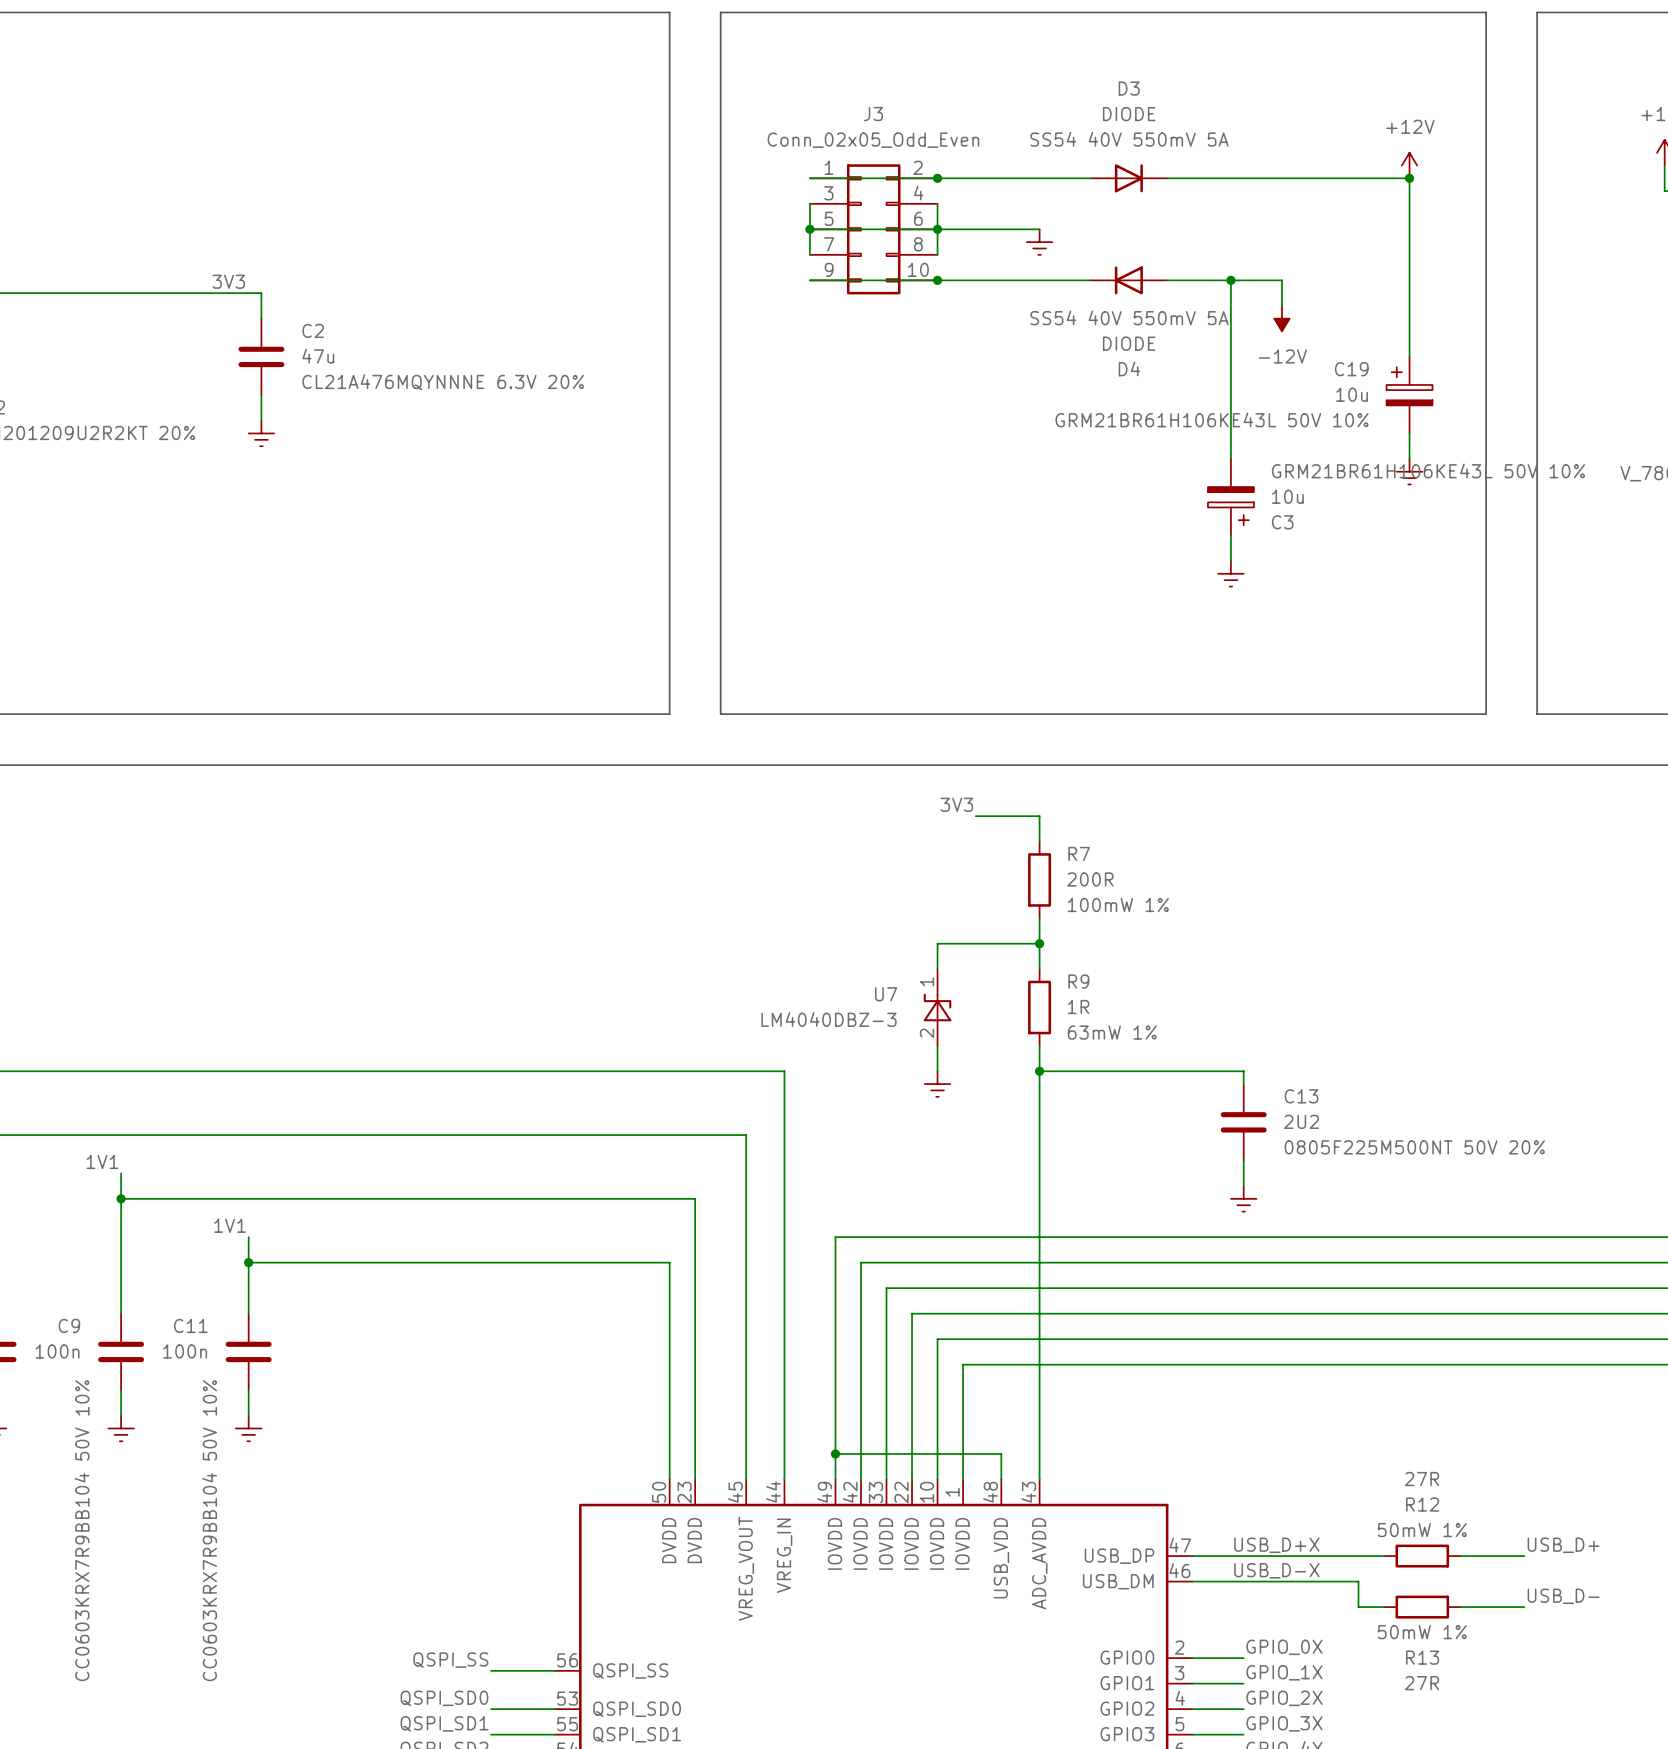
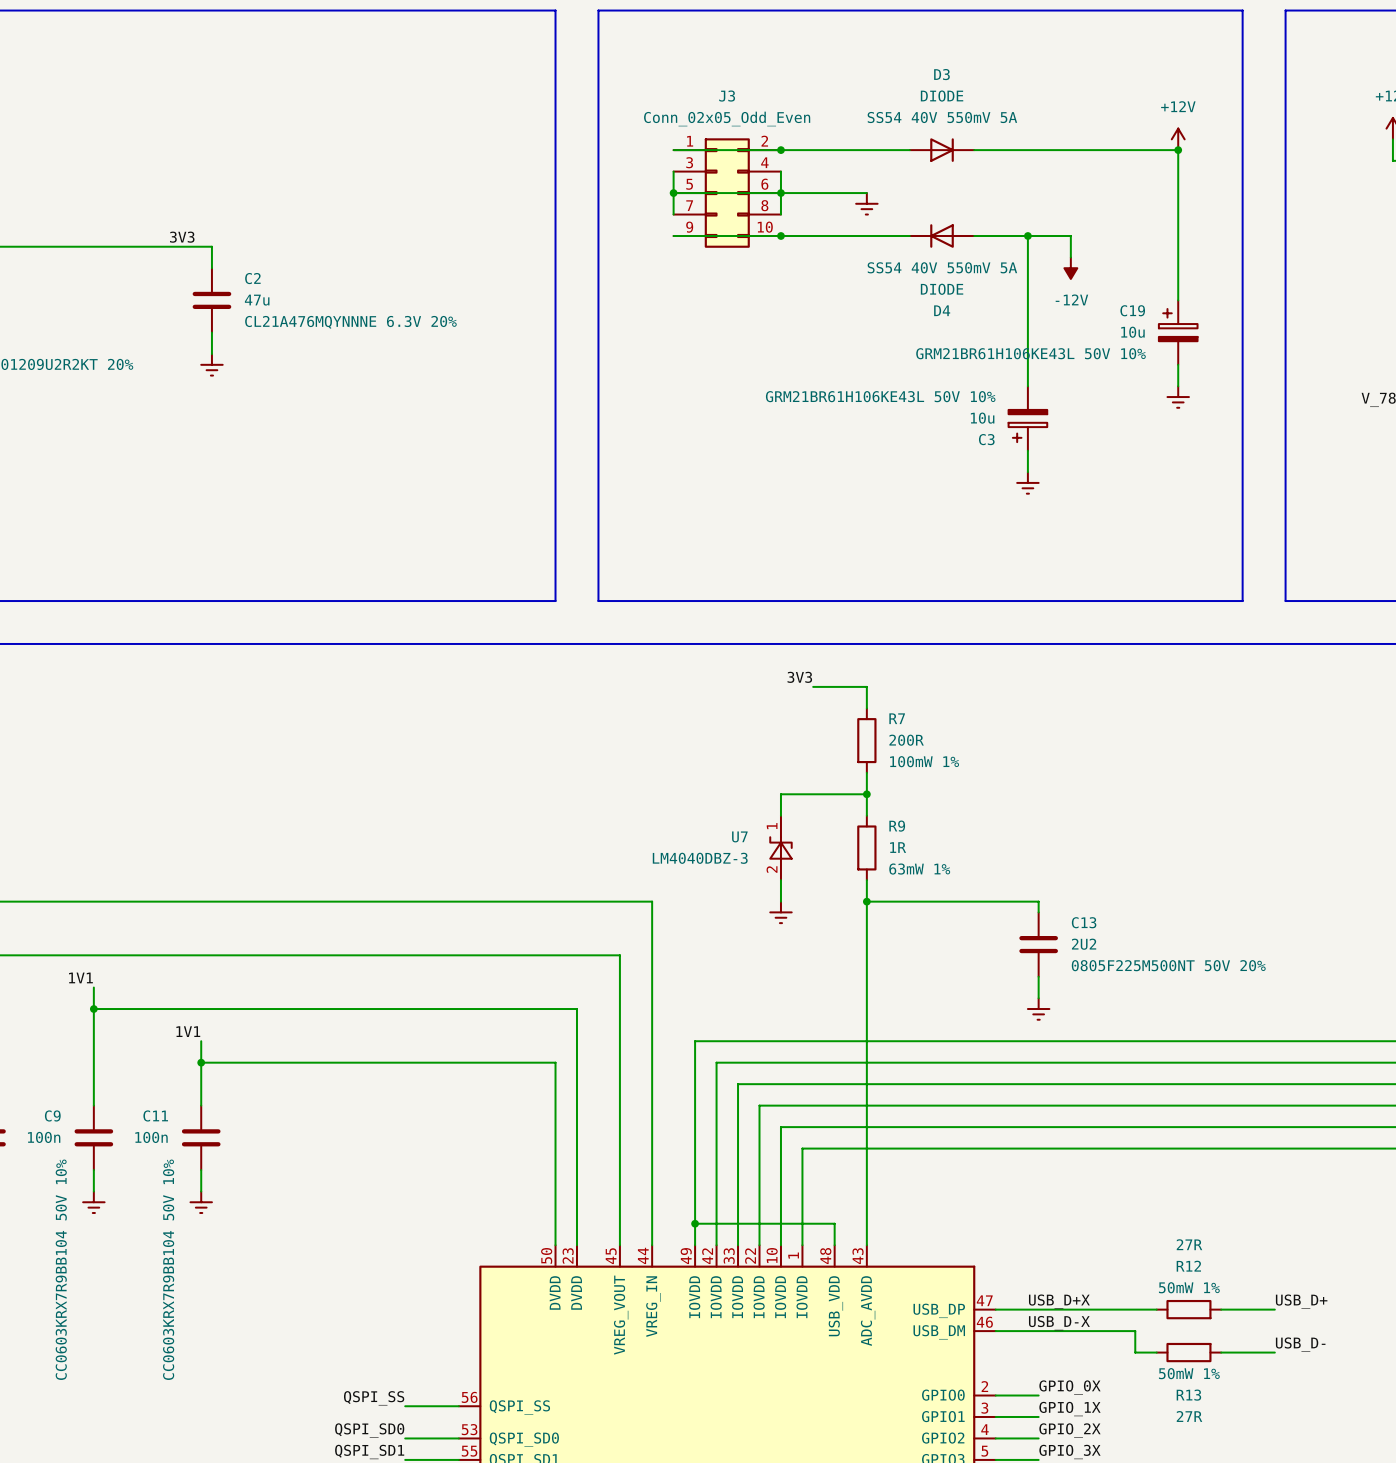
C3 flip: as is (1230, 506) -> left-right (1027, 426)

